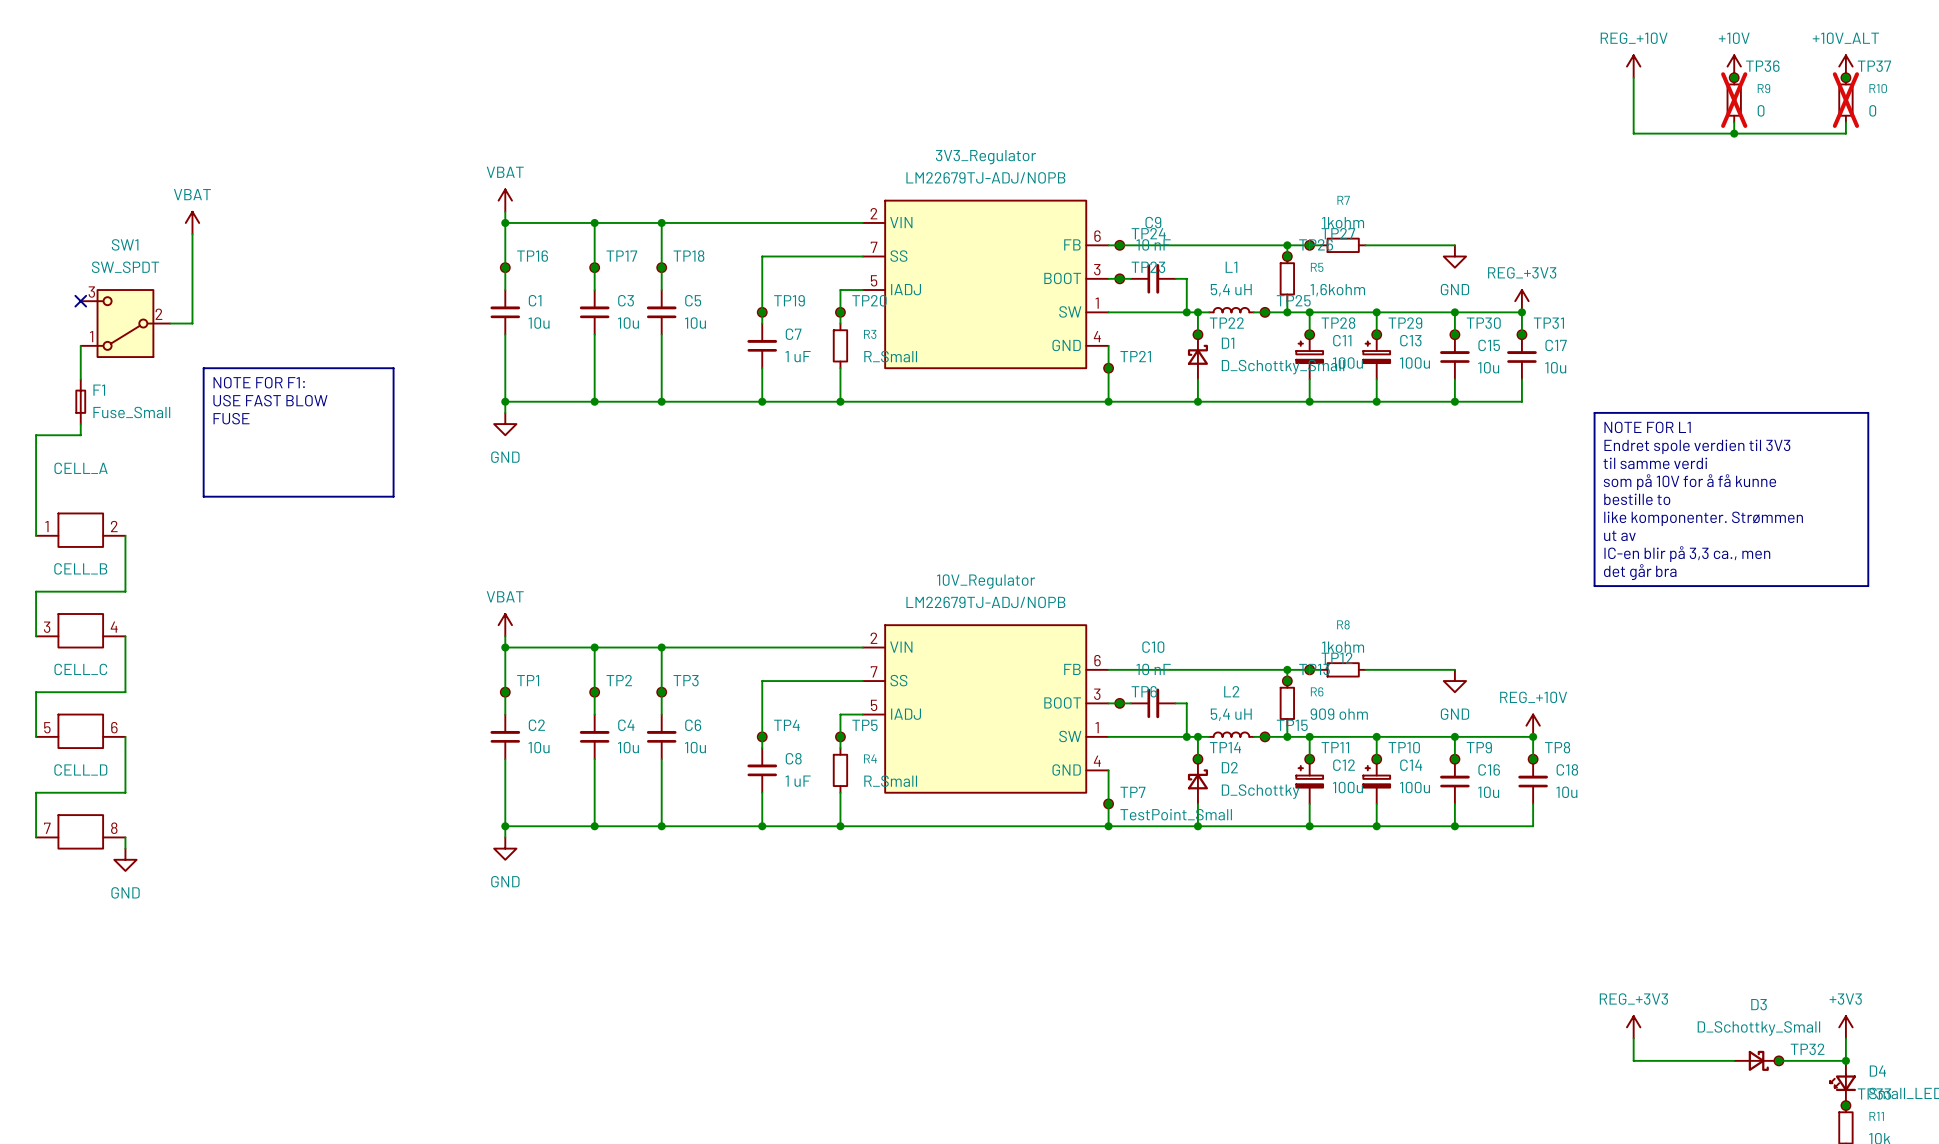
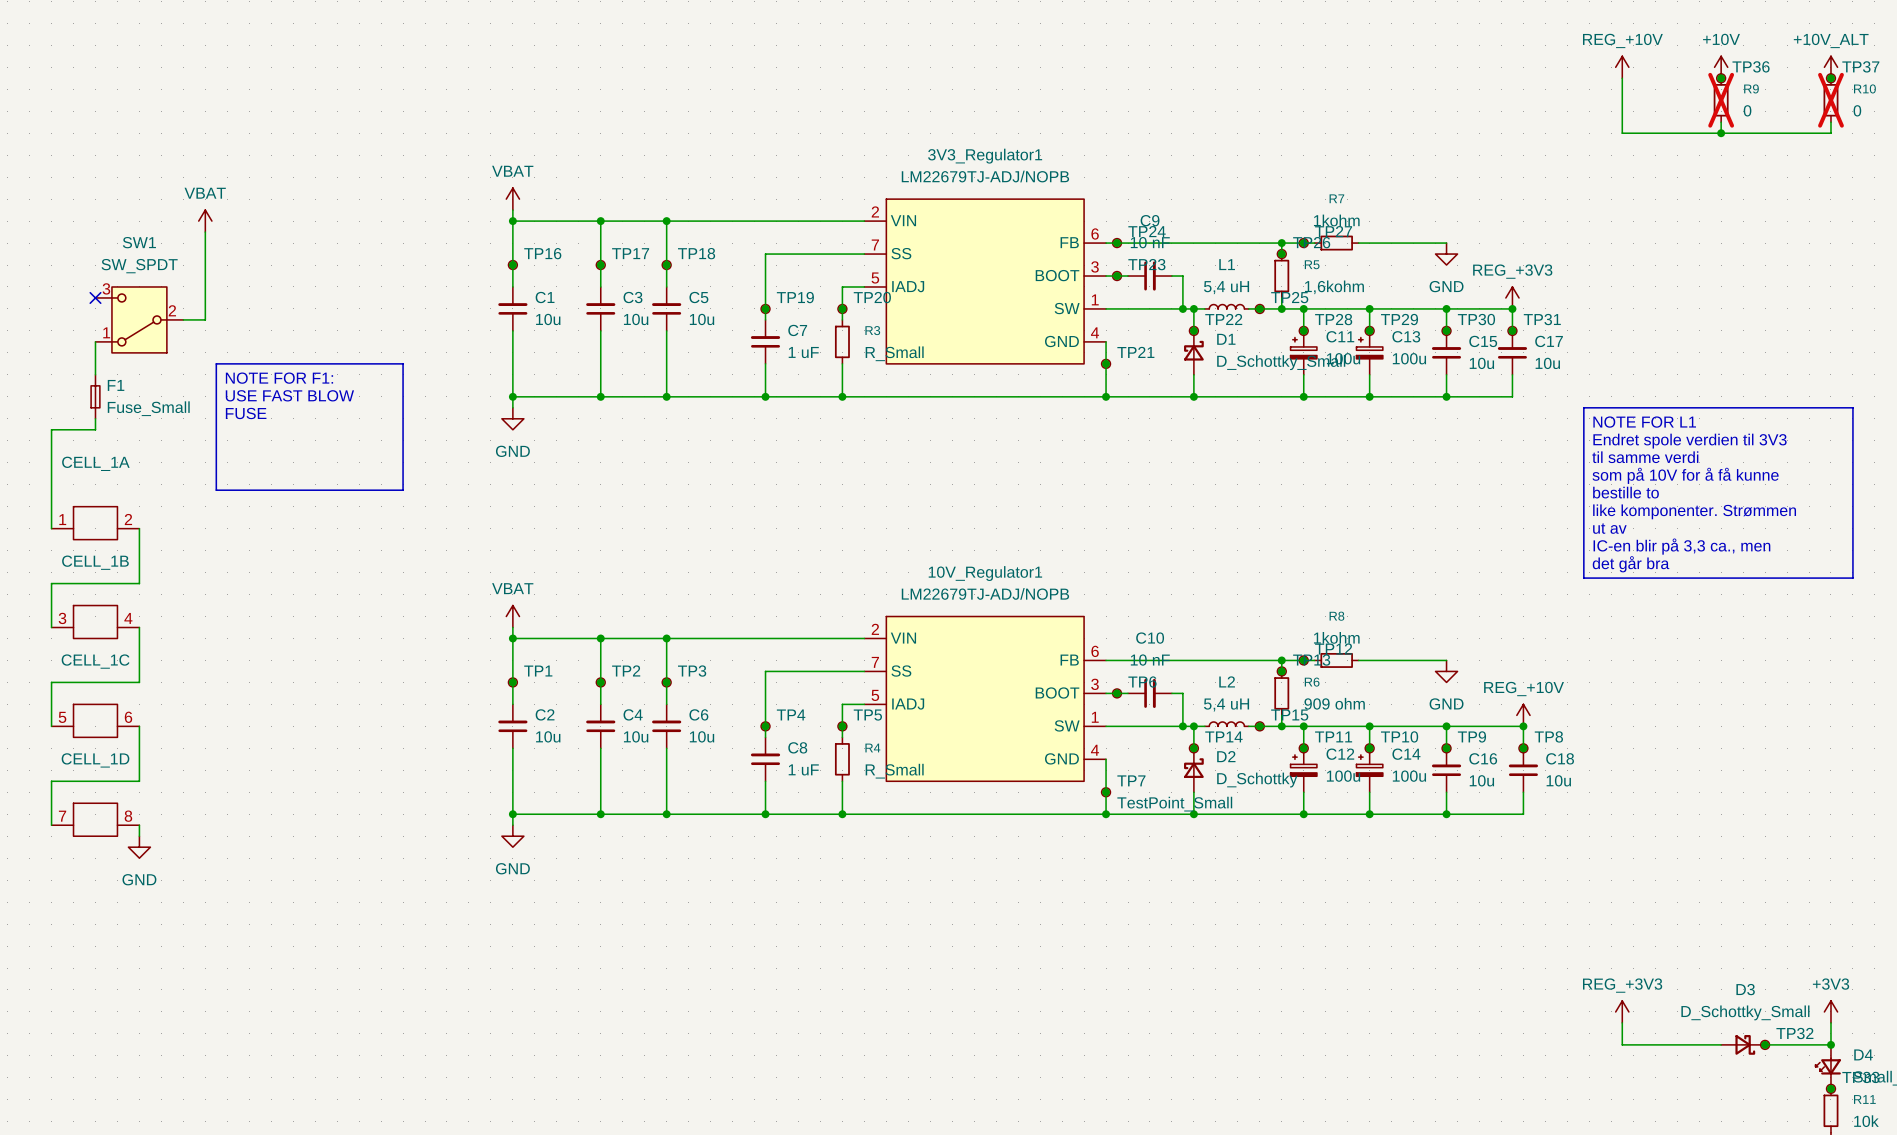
3V3_Regulator name: 3V3_Regulator (985, 157) -> 3V3_Regulator1 (985, 156)
CELL_A name: CELL_A (81, 468) -> CELL_1A (95, 463)
CELL_B name: CELL_B (80, 568) -> CELL_1B (95, 562)
10V_Regulator name: 10V_Regulator (986, 581) -> 10V_Regulator1 (985, 573)
CELL_C name: CELL_C (80, 669) -> CELL_1C (95, 661)
CELL_D name: CELL_D (80, 770) -> CELL_1D (95, 760)

